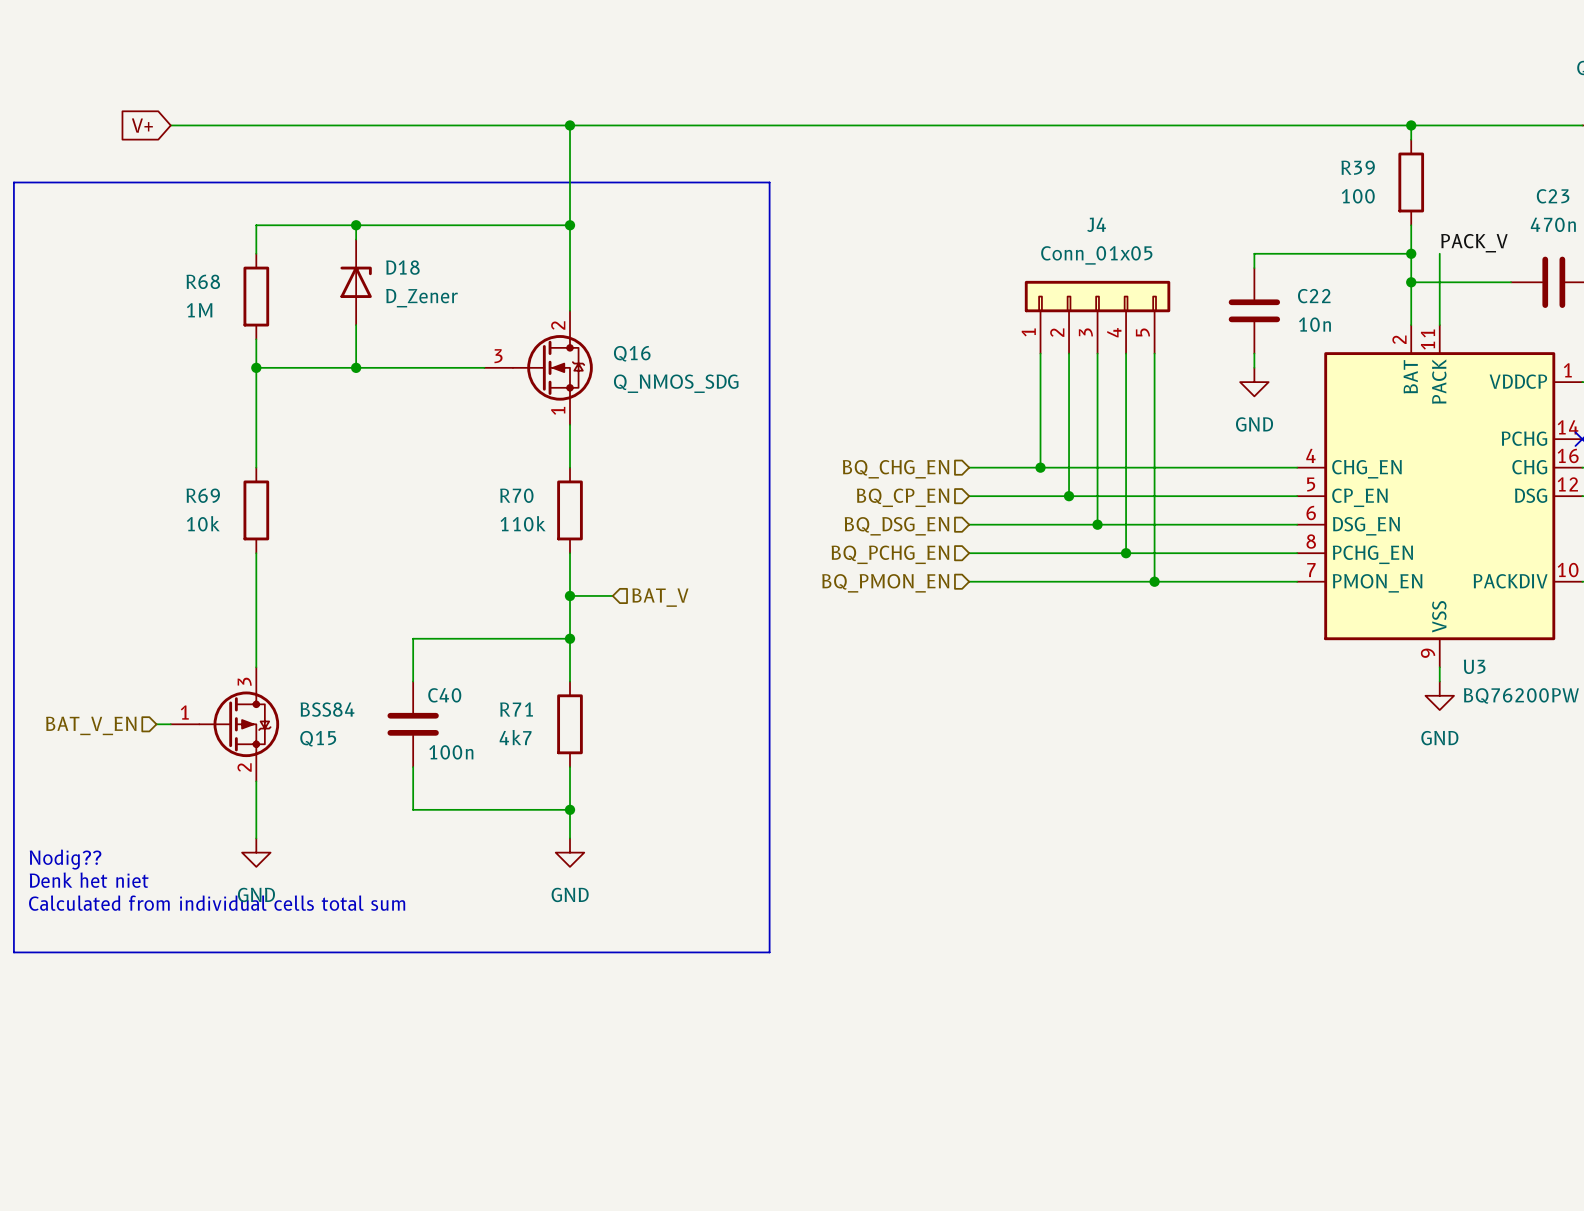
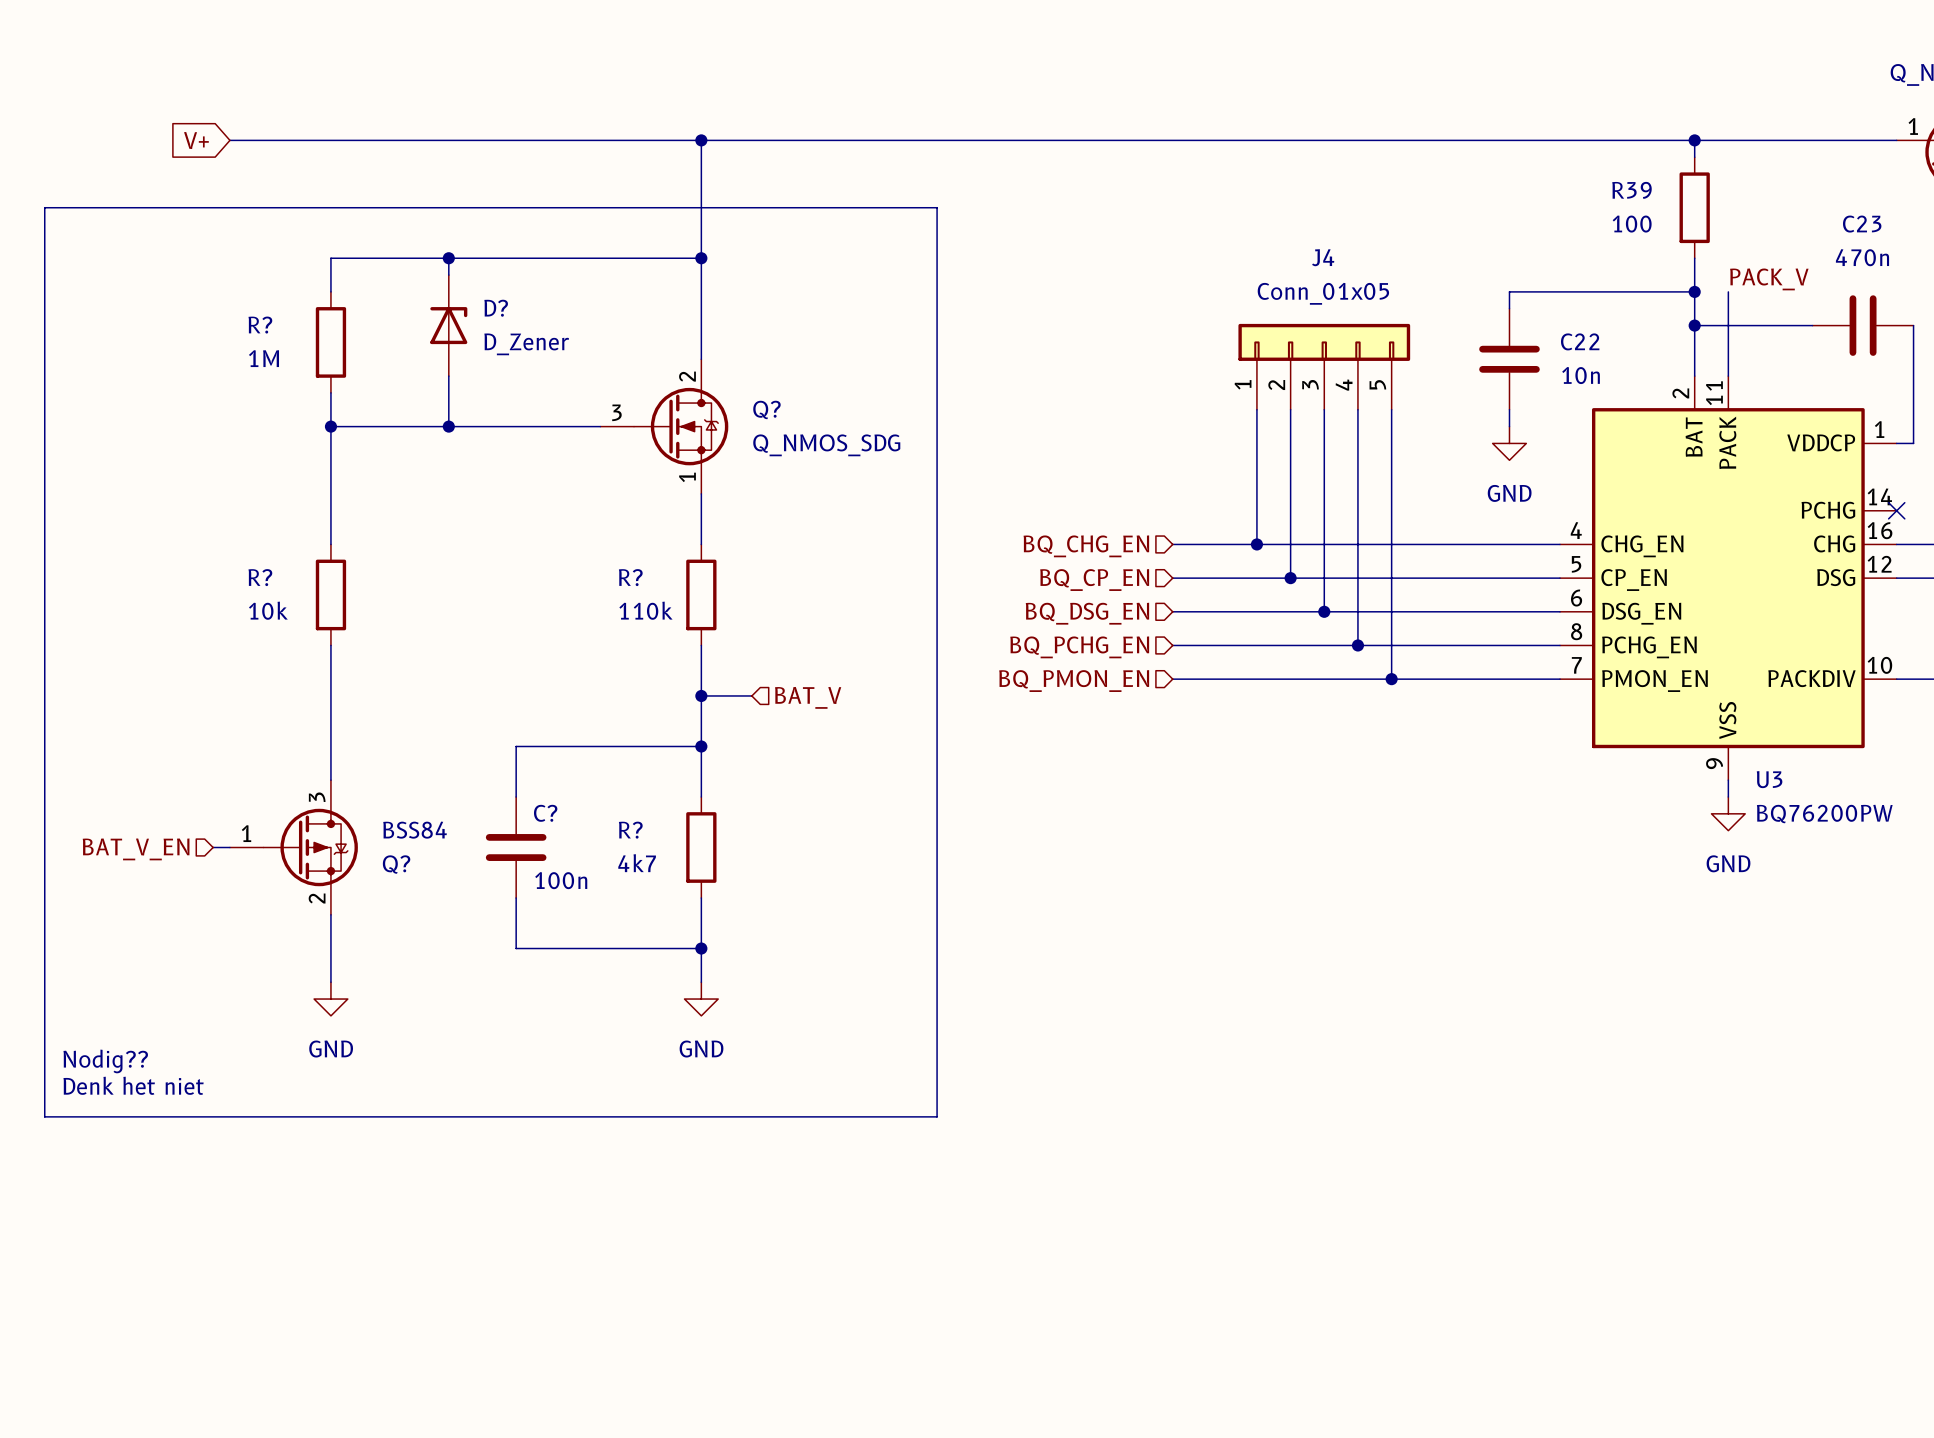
D18 name: D18 (402, 267) -> D? (496, 308)
R68 name: R68 (203, 281) -> R? (260, 325)
Q16 name: Q16 (632, 353) -> Q? (766, 409)
R69 name: R69 (203, 495) -> R? (260, 577)
R70 name: R70 (516, 495) -> R? (630, 577)
C40 name: C40 (444, 695) -> C? (545, 813)
R71 name: R71 (516, 709) -> R? (630, 830)
Q15 name: Q15 (318, 738) -> Q? (396, 864)
text: Nodig?? (65, 859) -> none
text position: Denk het niet (89, 880) -> Denk het niet (133, 1085)
text: Calculated from individual cells total sum (217, 903) -> Nodig?? (105, 1061)

